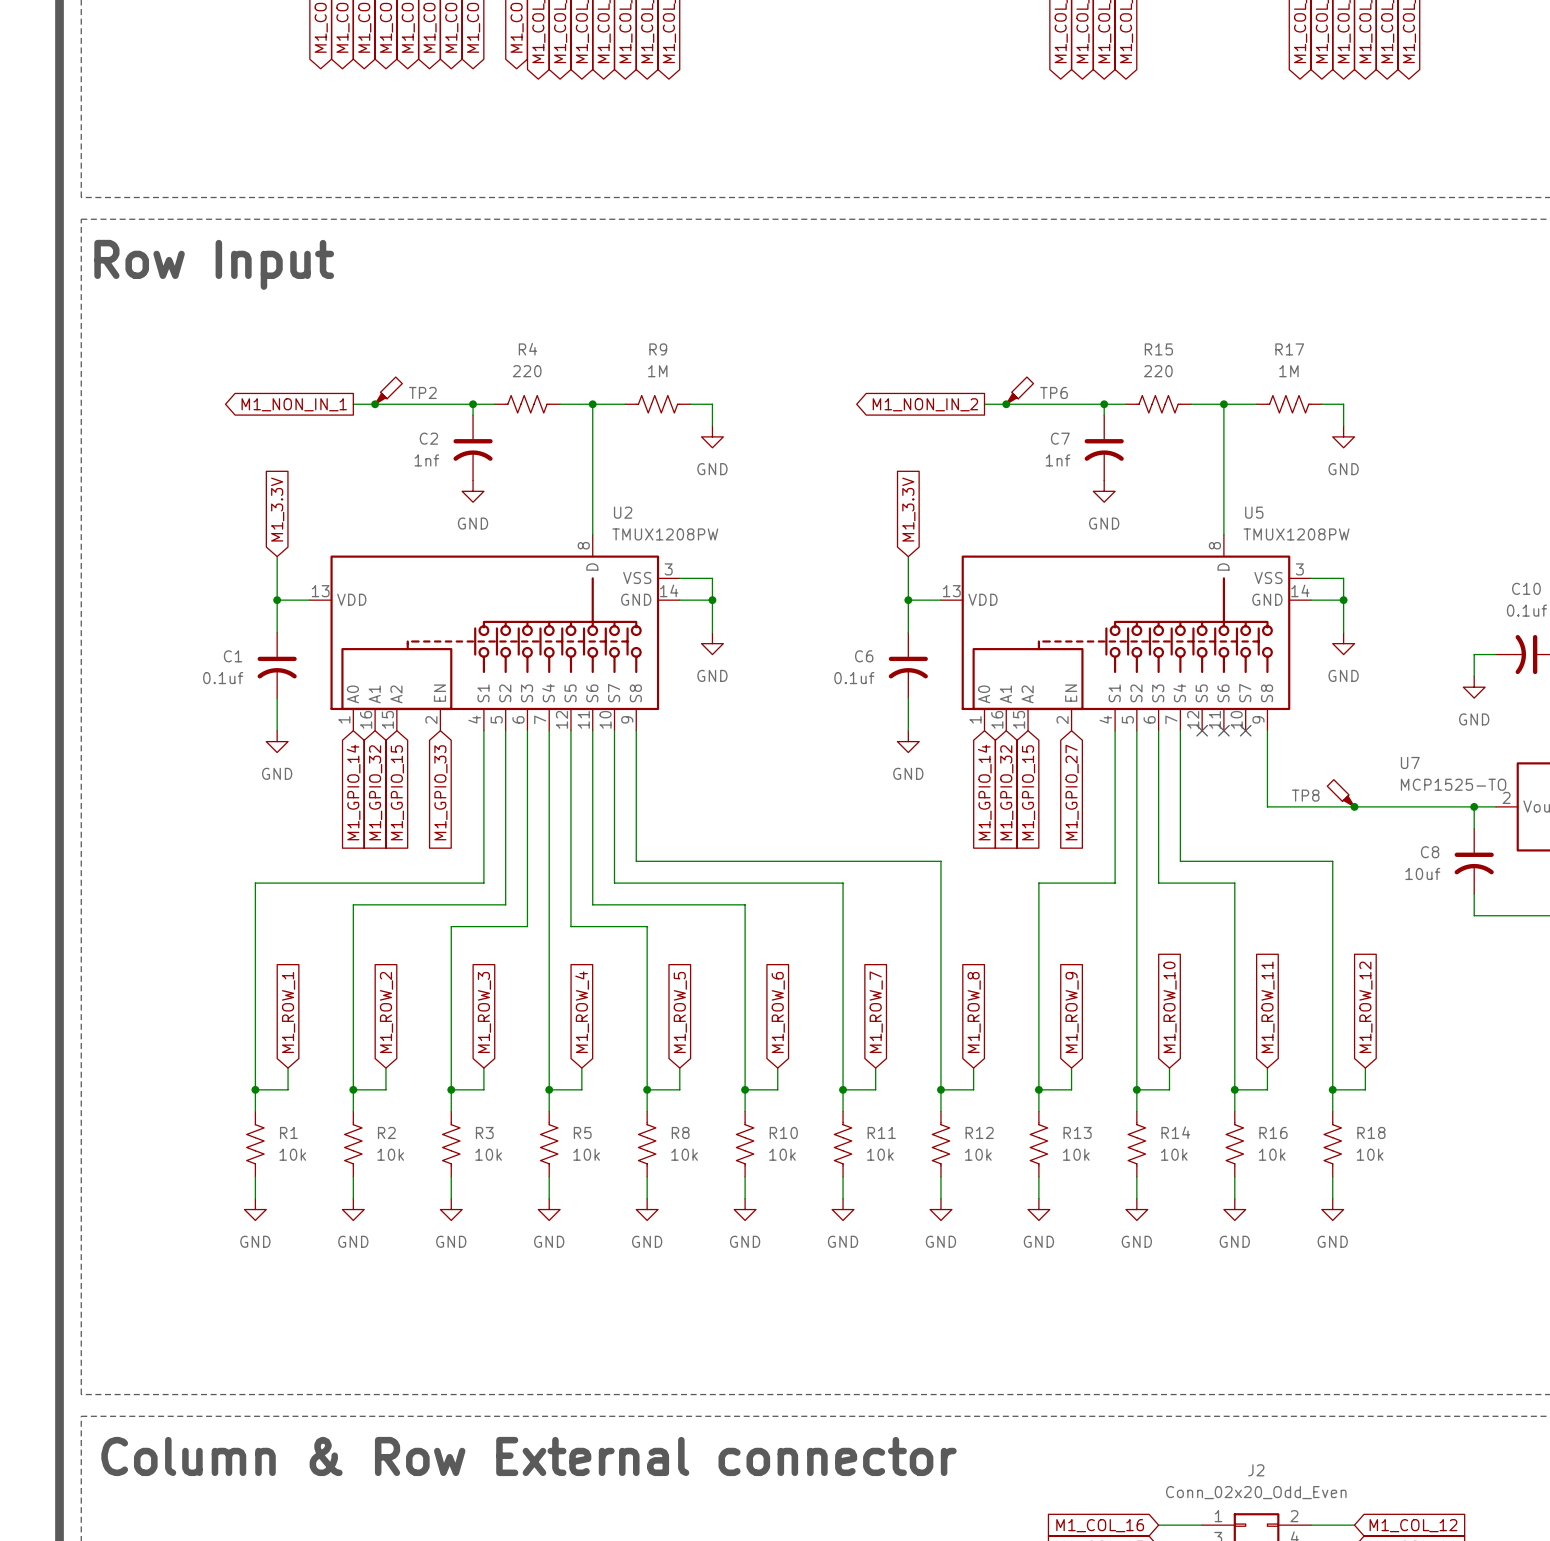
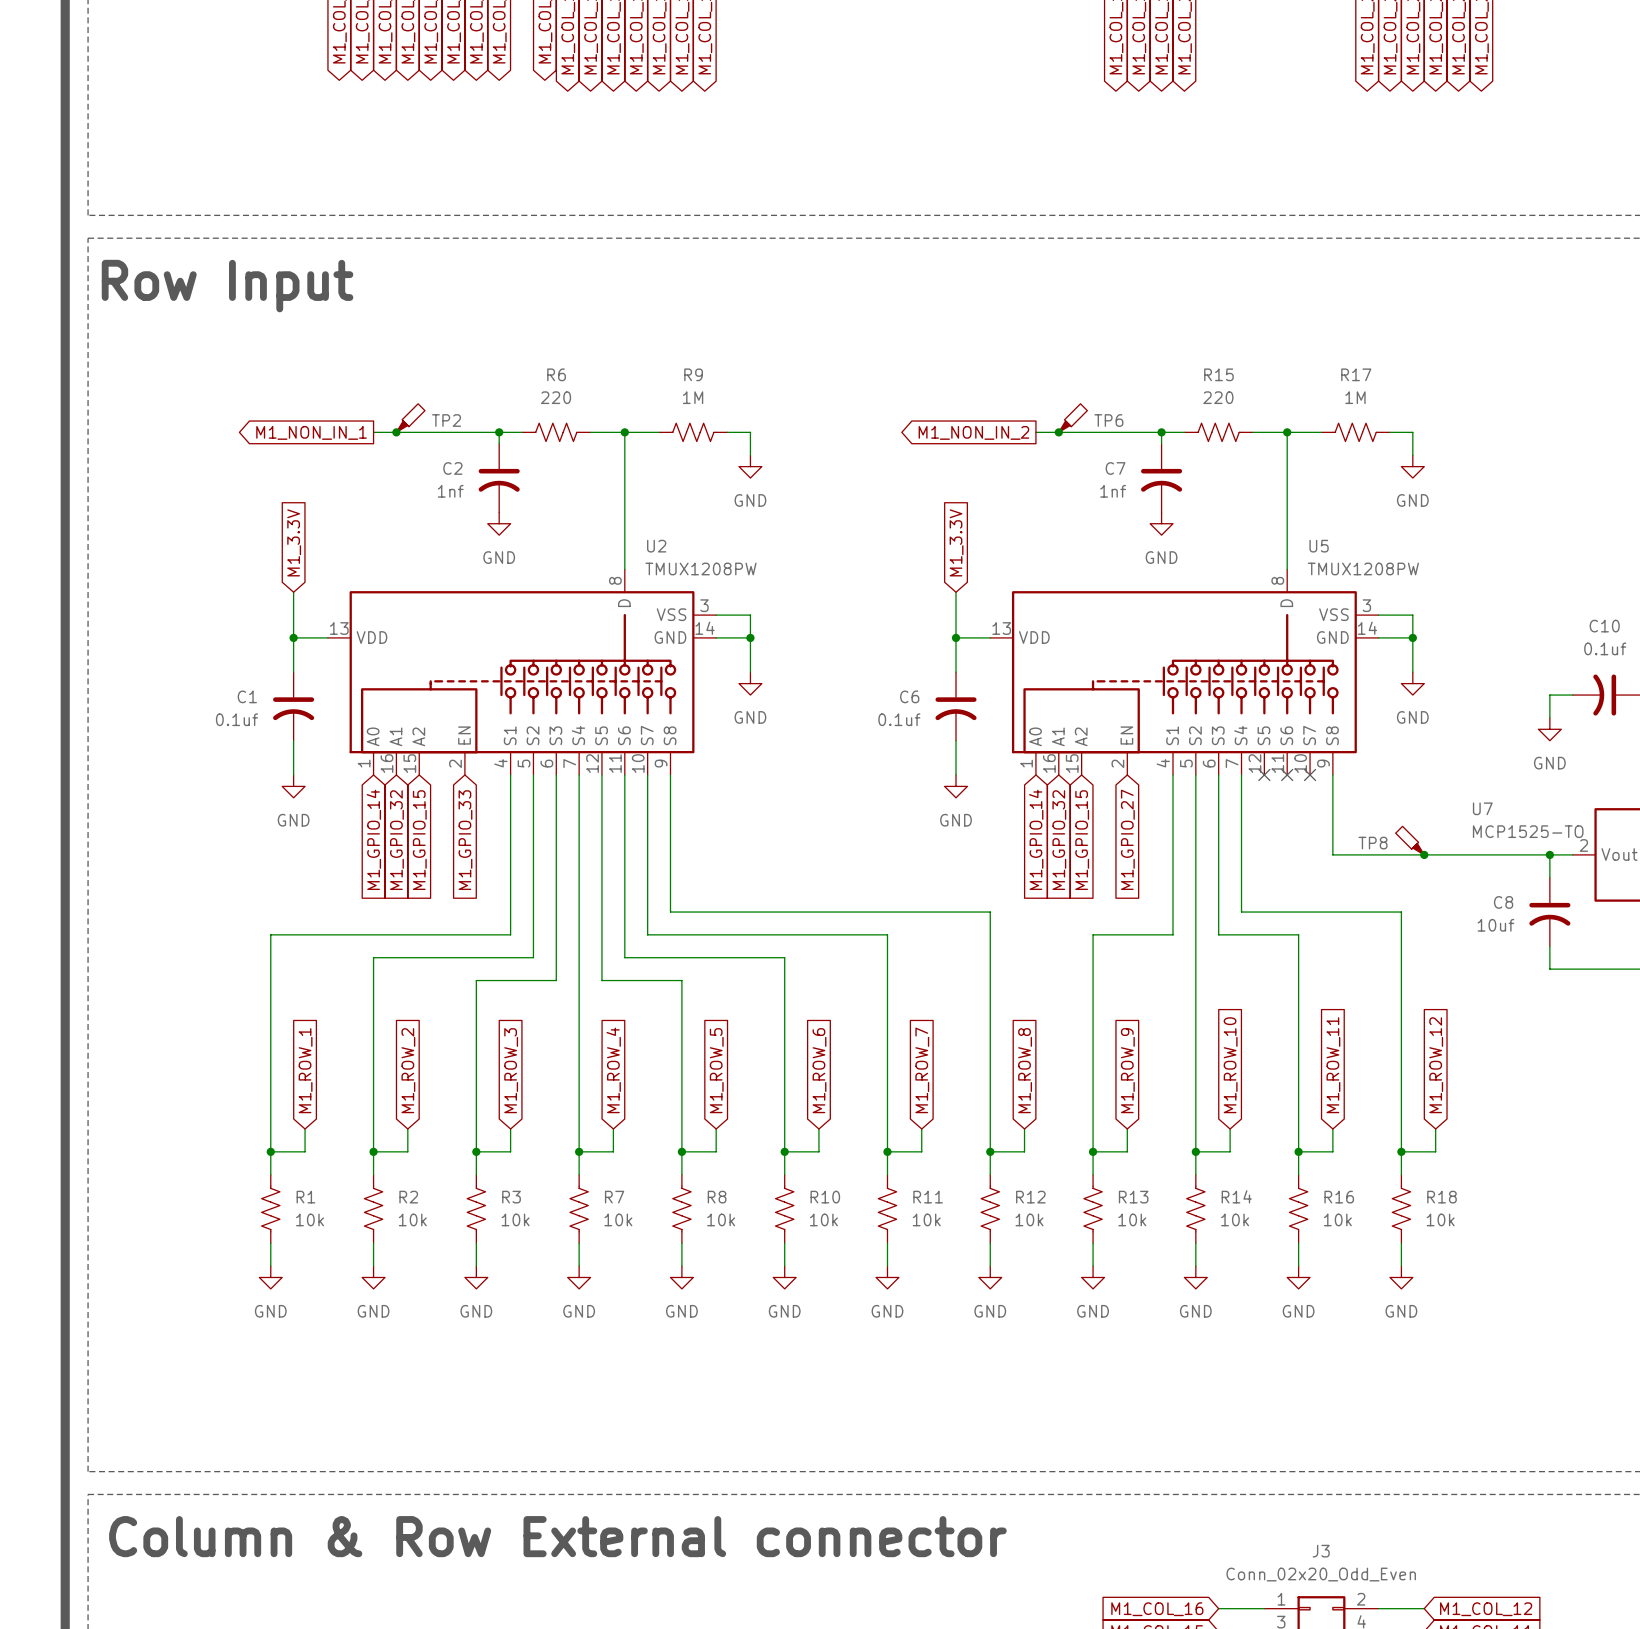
R4 name: R4 (527, 349) -> R6 (556, 374)
R5 name: R5 (582, 1132) -> R7 (614, 1197)
J2 name: J2 (1256, 1470) -> J3 (1321, 1551)

